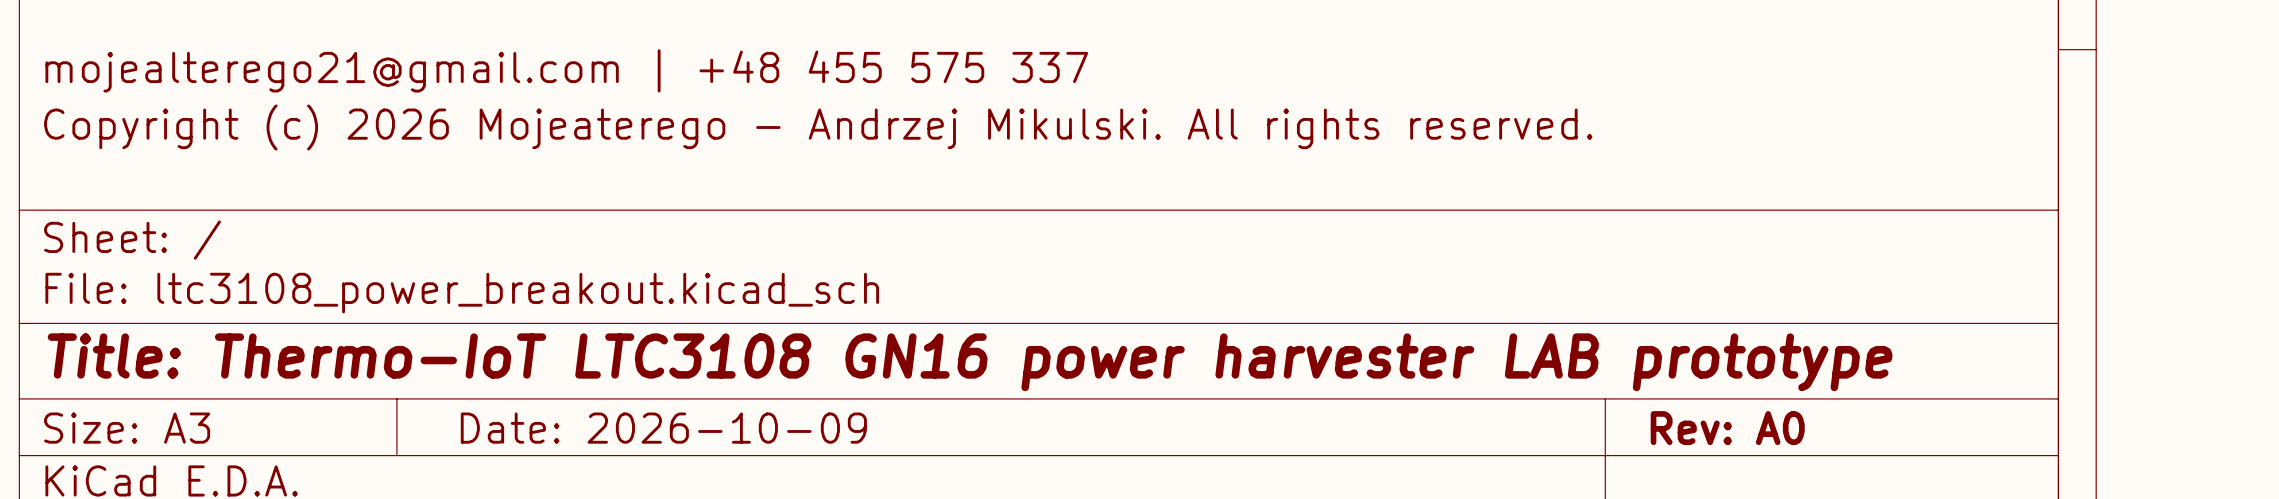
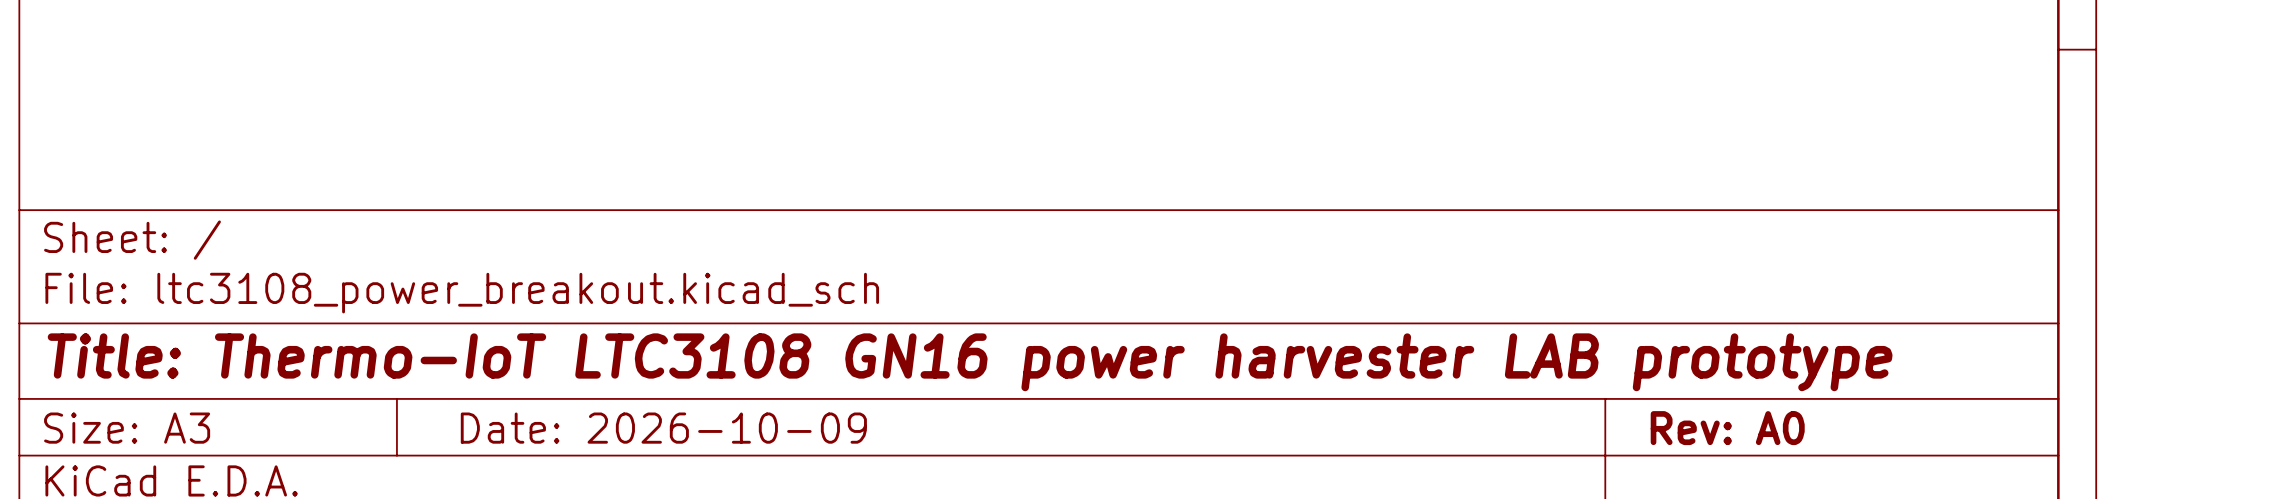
title block: mojealterego21@gmail.com | +48 455 575 337 (566, 70) -> none
title block: Copyright (c) 2026 Mojeaterego - Andrzej Mikulski. All rights reserved. (818, 127) -> none

